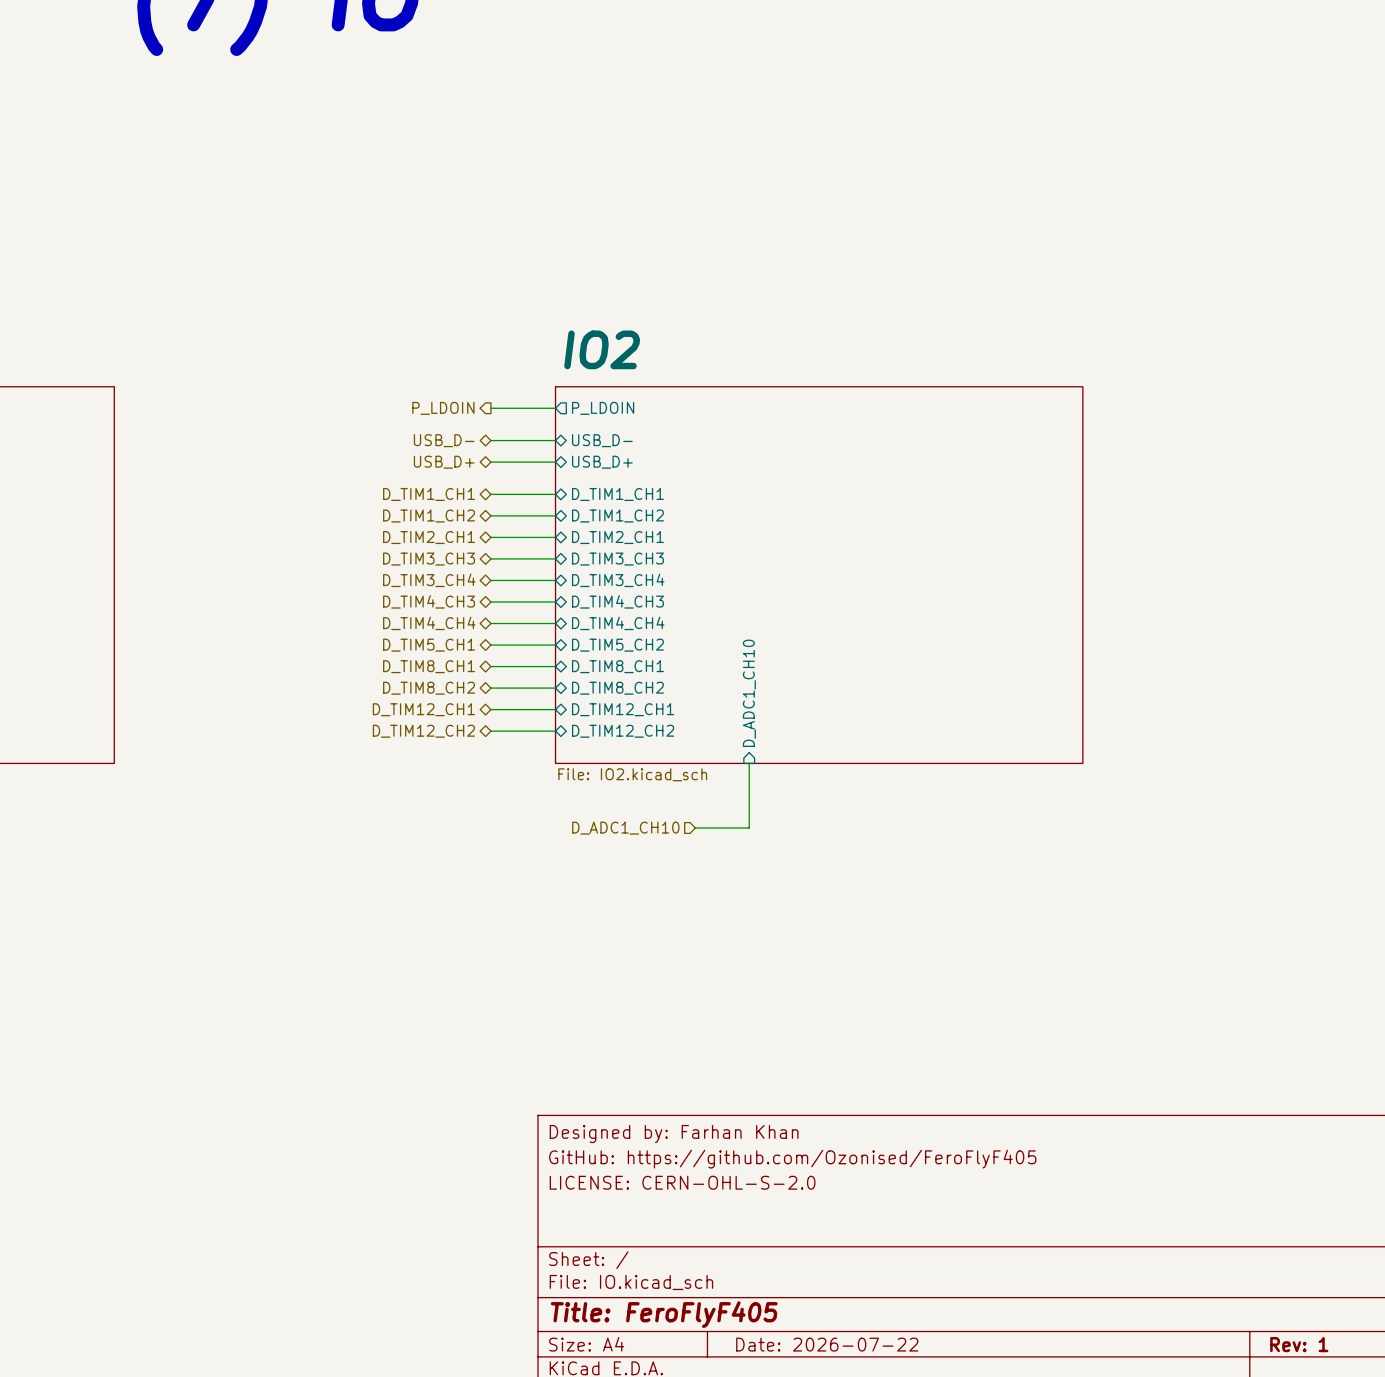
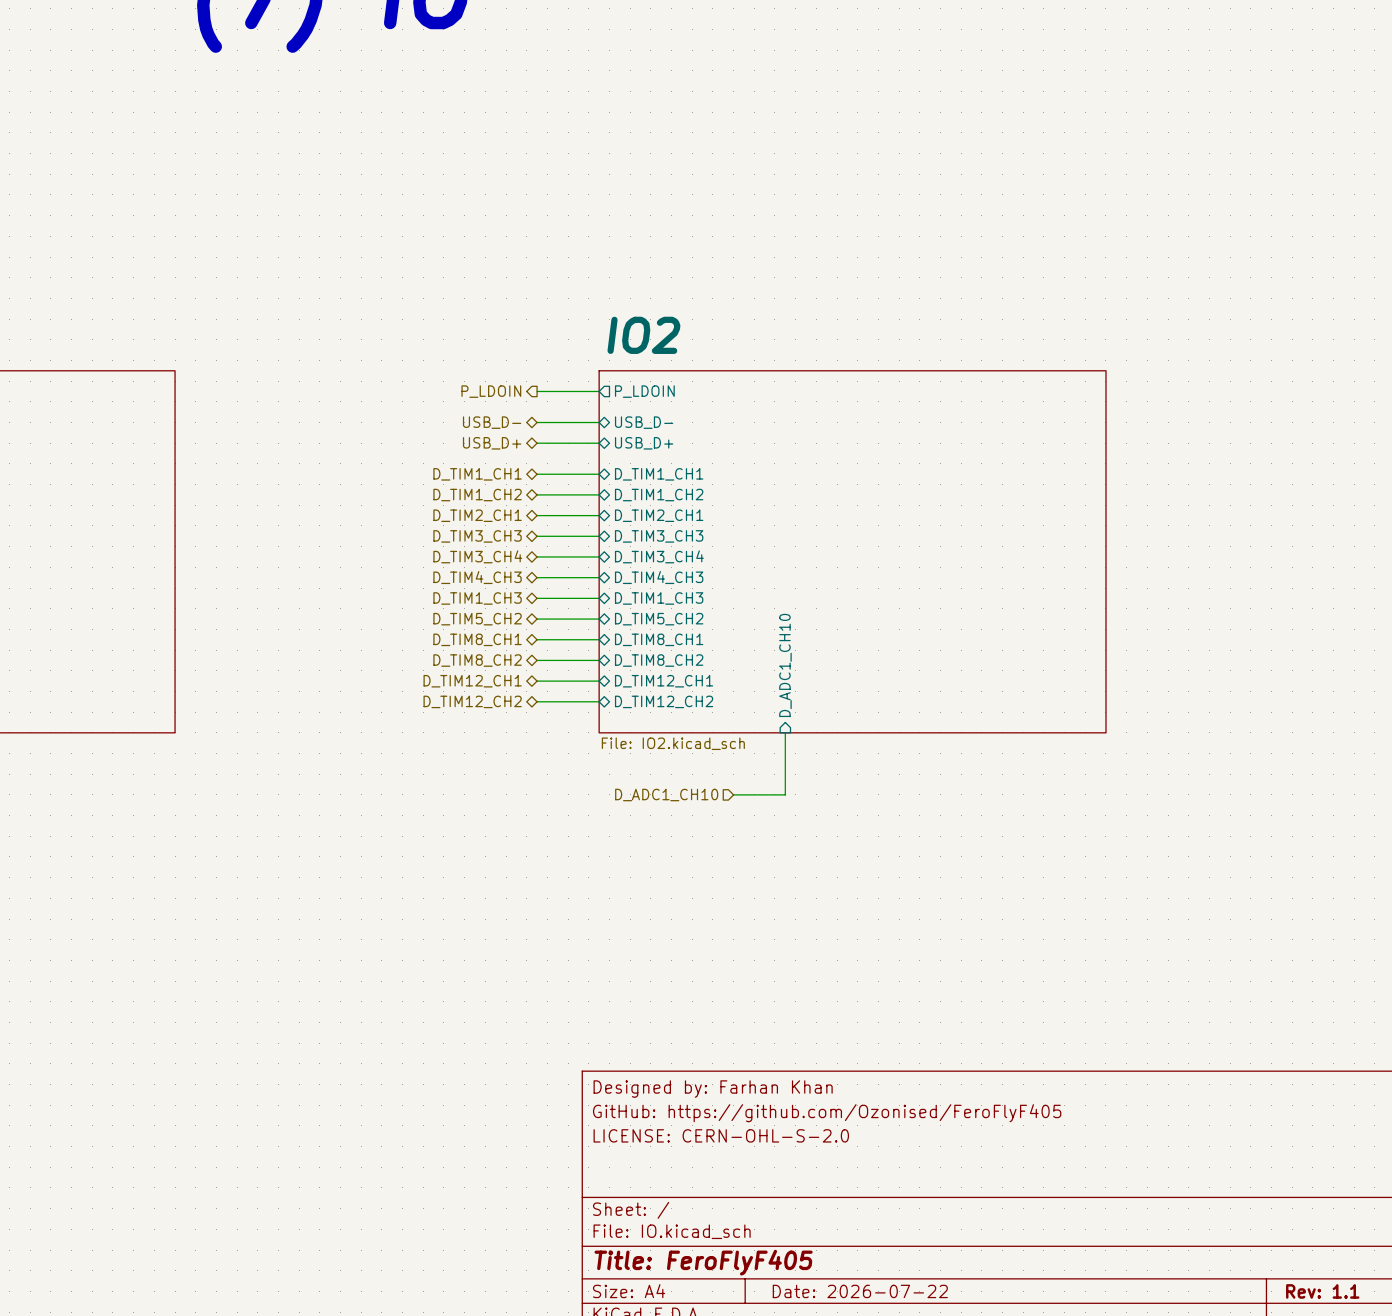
hierarchical label: D_TIM4_CH4 (429, 623) -> D_TIM1_CH3 (477, 598)
sheet pin: D_TIM4_CH4 (618, 623) -> D_TIM1_CH3 (659, 598)
hierarchical label: D_TIM5_CH1 (429, 645) -> D_TIM5_CH2 (477, 619)
title block: Rev: 1 (1299, 1344) -> Rev: 1.1 (1322, 1291)

